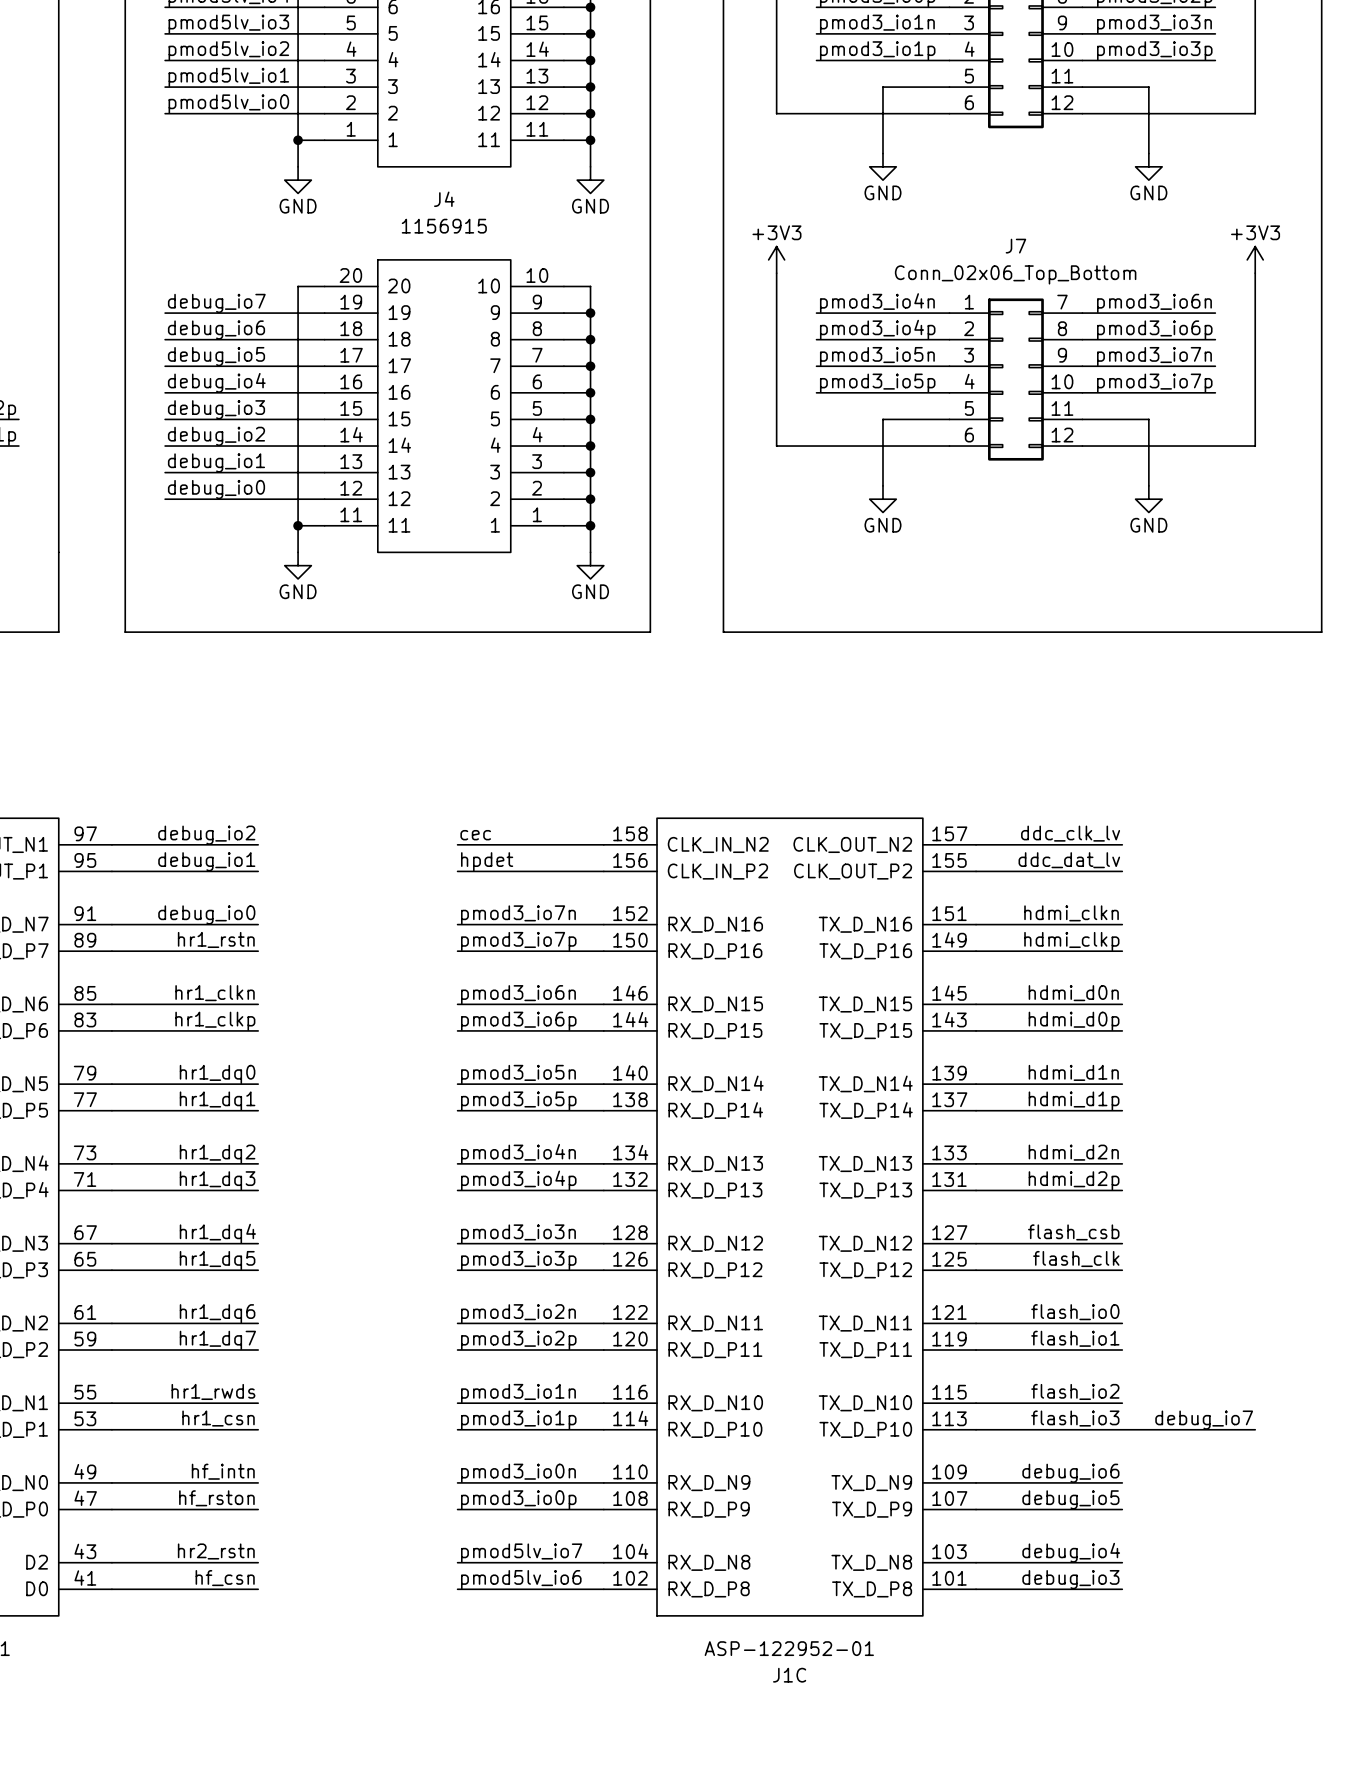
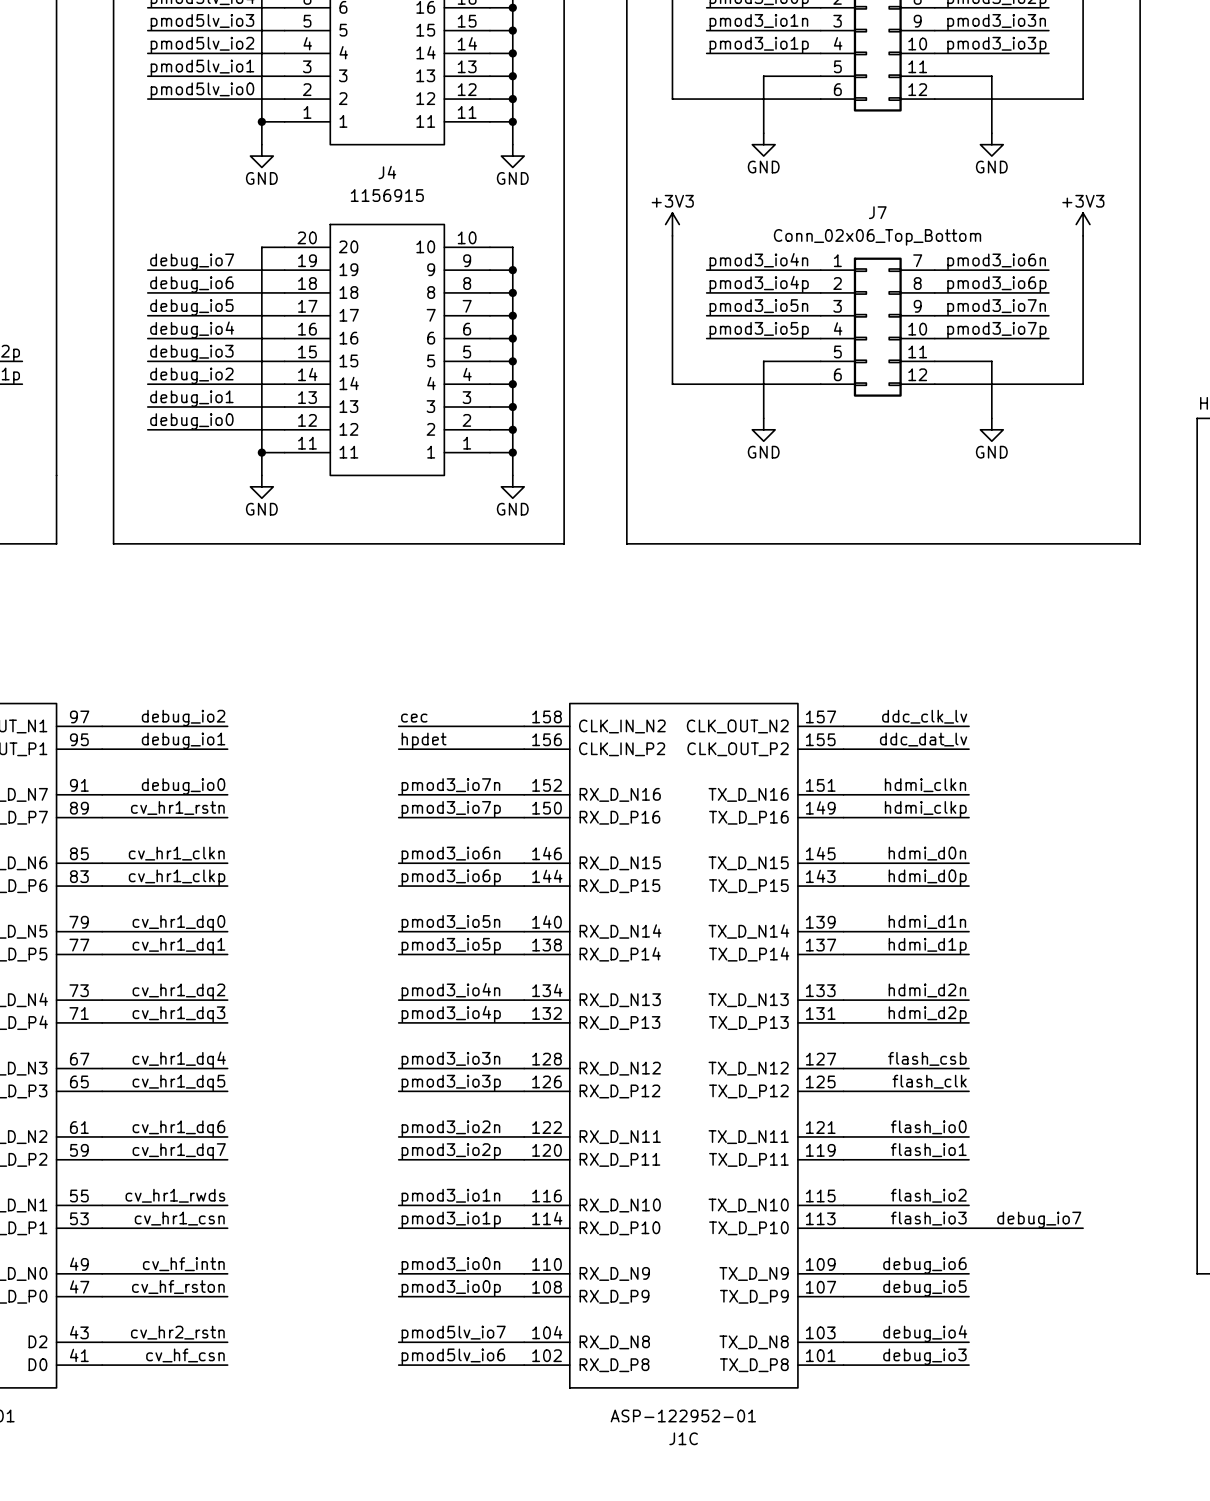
label: hr1_rstn (216, 939) -> cv_hr1_rstn (177, 807)
label: hr1_clkn (215, 993) -> cv_hr1_clkn (176, 853)
label: hr1_clkp (215, 1021) -> cv_hr1_clkp (177, 877)
label: hr1_dq0 (217, 1074) -> cv_hr1_dq0 (178, 923)
label: hr1_dq1 (217, 1101) -> cv_hr1_dq1 (178, 946)
label: hr1_dq2 (217, 1154) -> cv_hr1_dq2 (178, 991)
label: hr1_dq3 (217, 1180) -> cv_hr1_dq3 (178, 1014)
label: hr1_dq4 (217, 1233) -> cv_hr1_dq4 (179, 1059)
label: hr1_dq5 (217, 1260) -> cv_hr1_dq5 (178, 1083)
label: hr1_dq6 (217, 1313) -> cv_hr1_dq6 (178, 1128)
label: hr1_dq7 (217, 1340) -> cv_hr1_dq7 (179, 1151)
label: hr1_rwds (213, 1391) -> cv_hr1_rwds (175, 1195)
label: hr1_csn (218, 1418) -> cv_hr1_csn (179, 1218)
label: hf_intn (223, 1471) -> cv_hf_intn (183, 1264)
label: hf_rston (216, 1498) -> cv_hf_rston (178, 1287)
label: hr2_rstn (216, 1551) -> cv_hr2_rstn (177, 1332)
label: hf_csn (225, 1578) -> cv_hf_csn (185, 1355)

